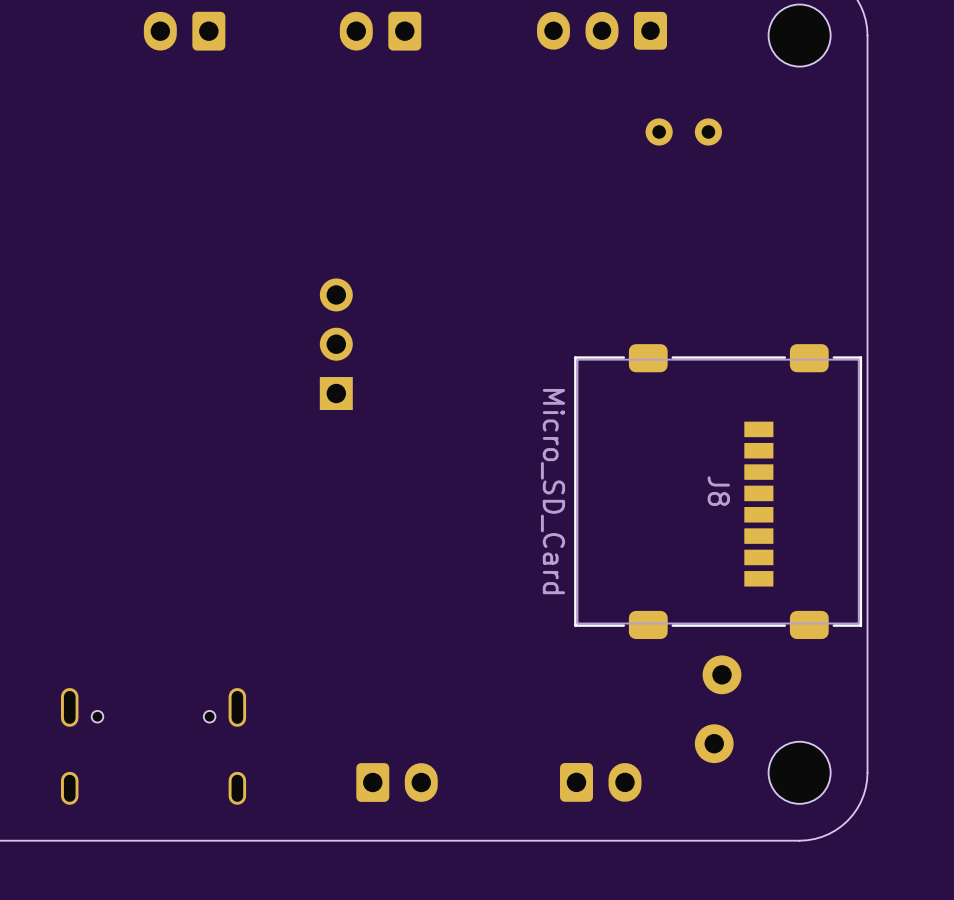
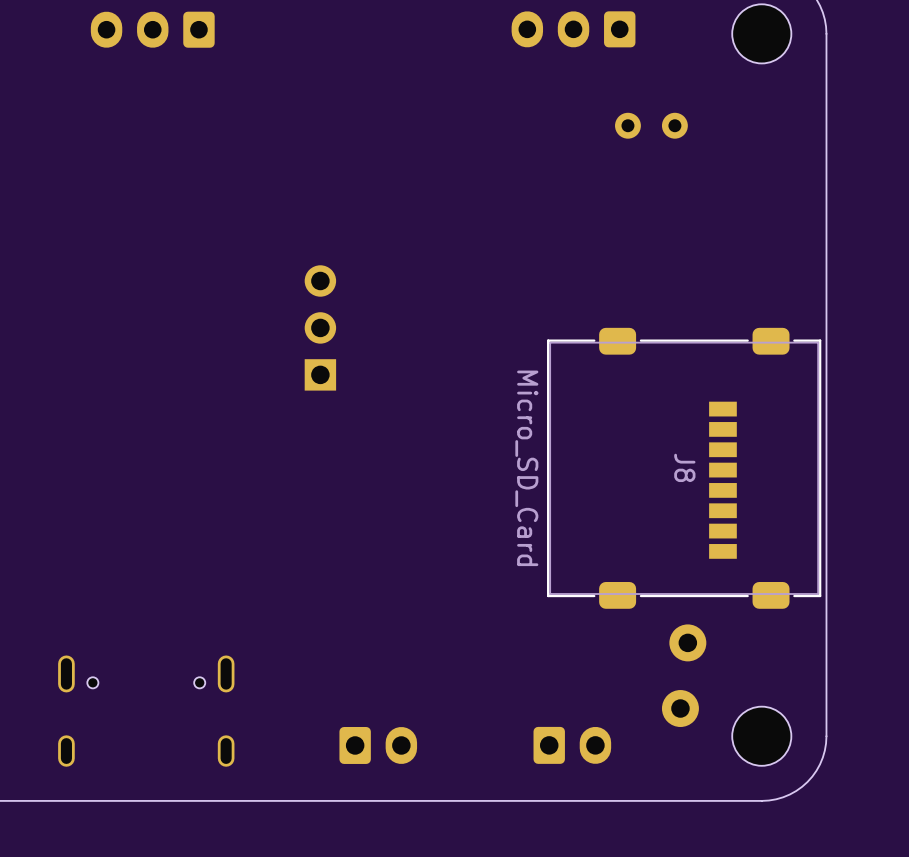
part: none -> (152, 29)
part: (184, 31) -> none
part: (380, 31) -> none

